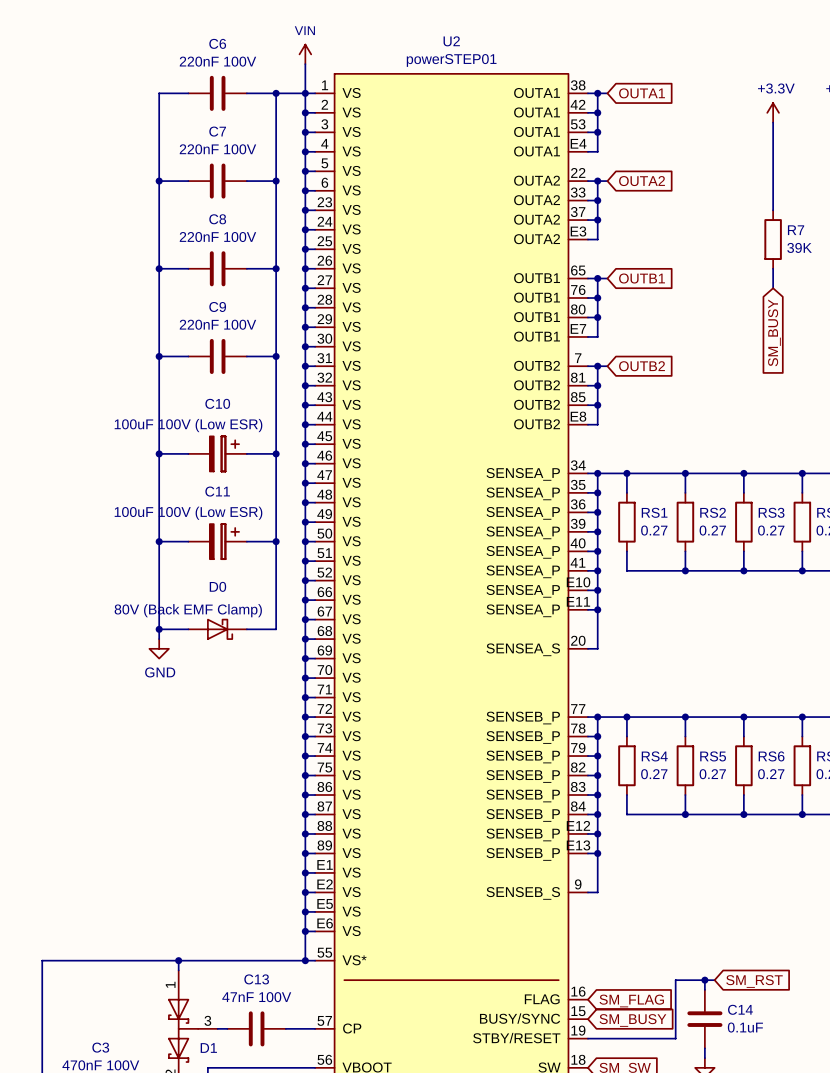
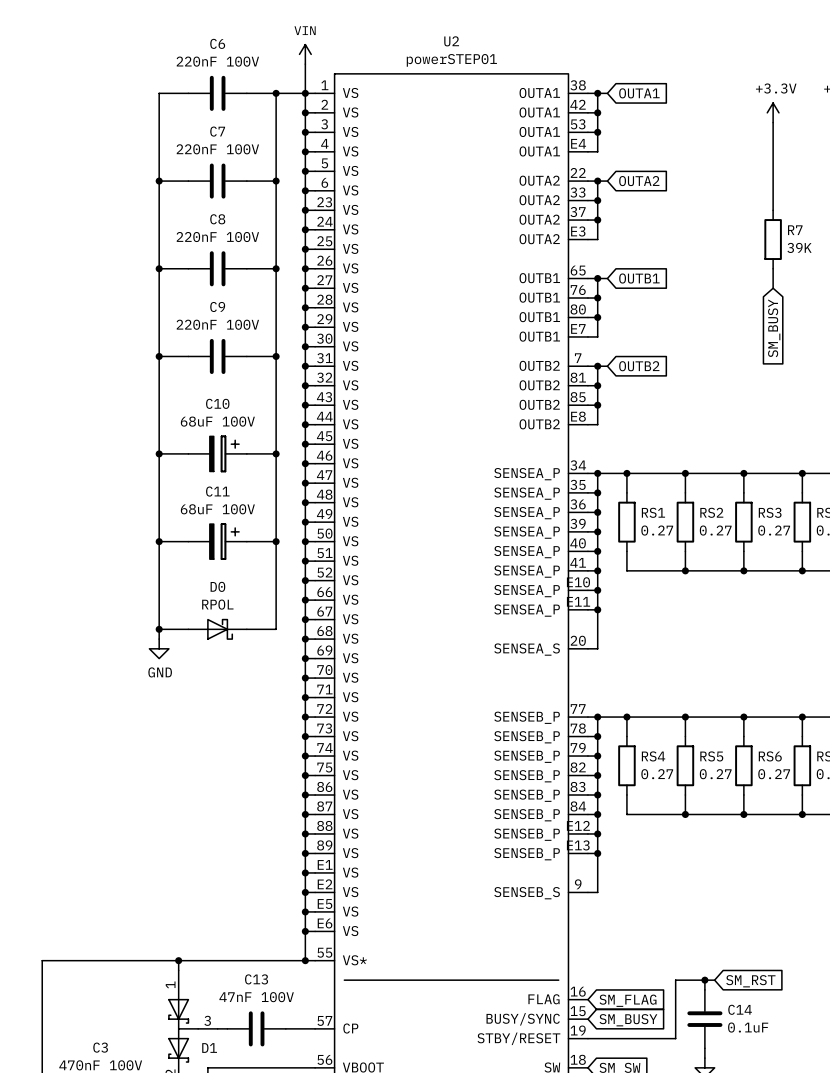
C10 value: 100uF 100V (Low ESR) (188, 425) -> 68uF 100V (217, 421)
C11 value: 100uF 100V (Low ESR) (188, 513) -> 68uF 100V (217, 509)
D0 value: 80V (Back EMF Clamp) (188, 610) -> RPOL (217, 604)

